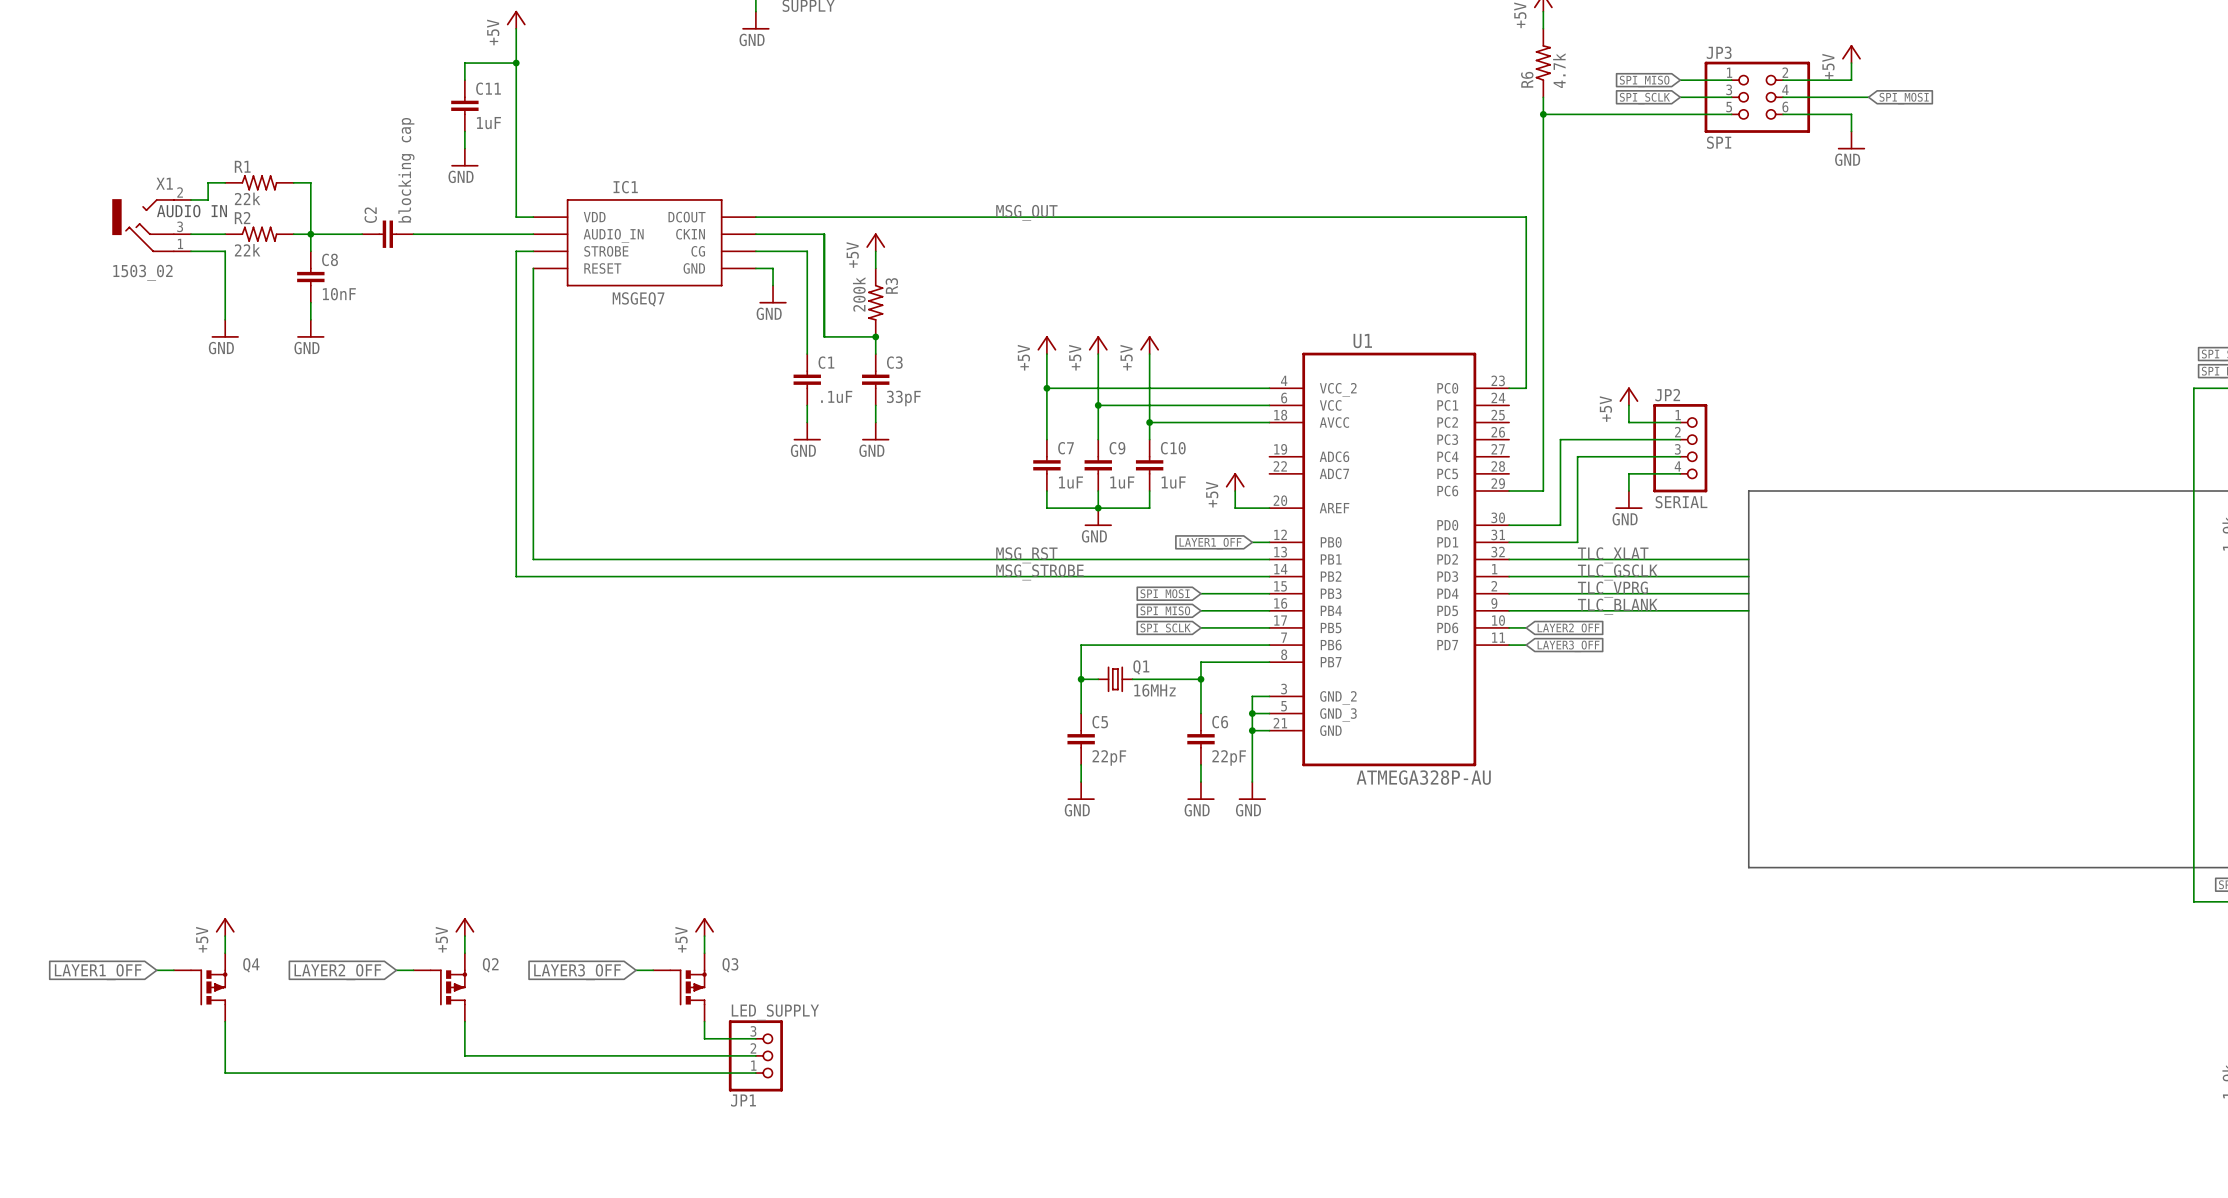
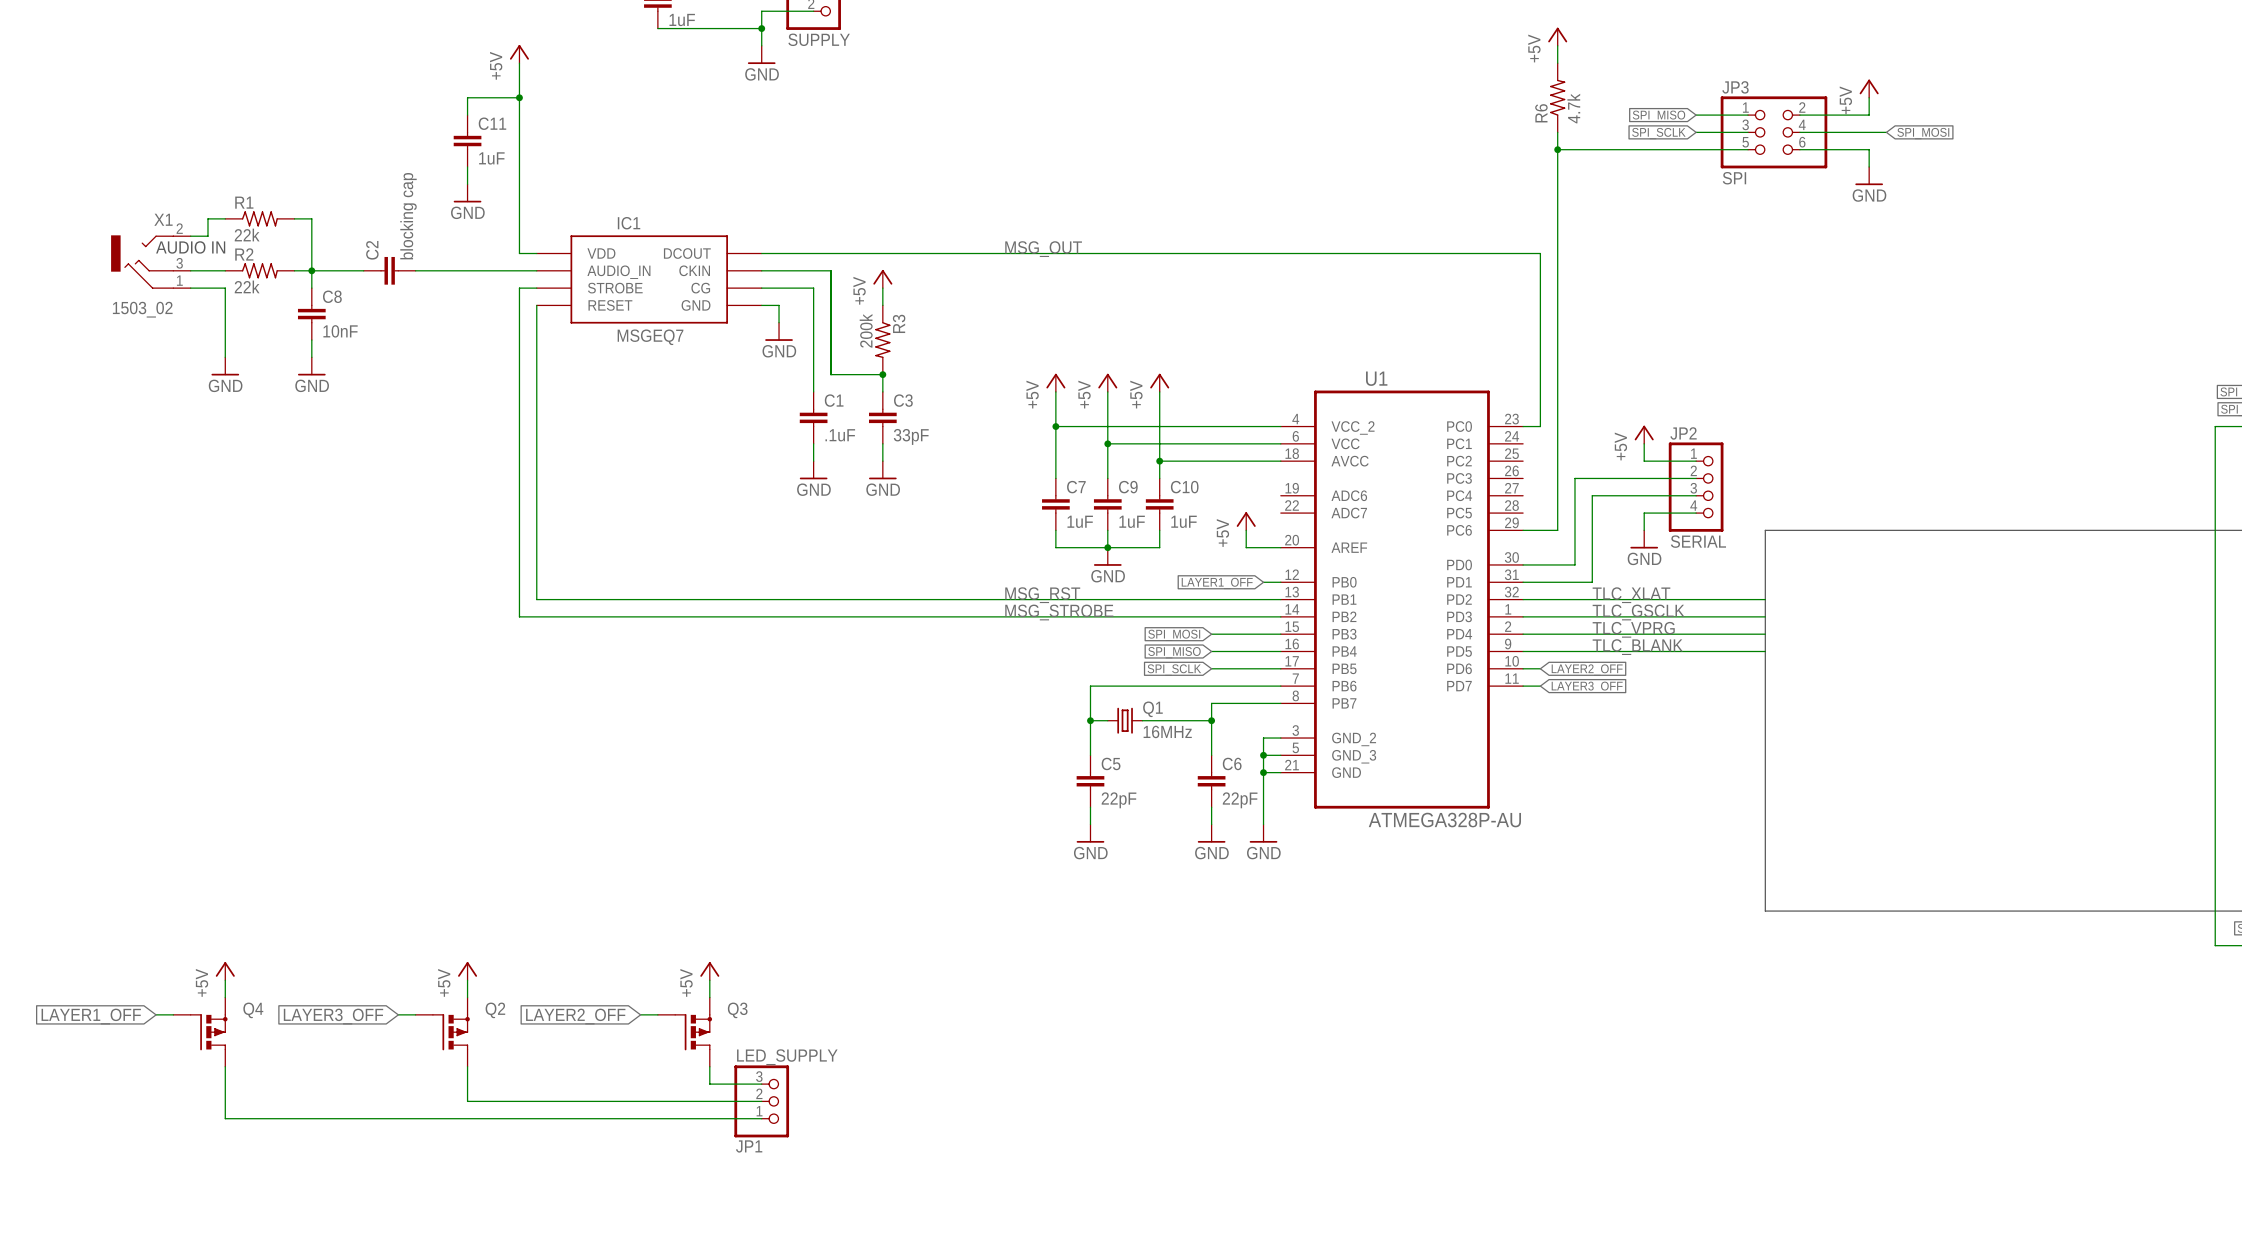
global label: LAYER2_OFF (337, 972) -> LAYER3_OFF (333, 1016)
global label: LAYER3_OFF (577, 972) -> LAYER2_OFF (575, 1016)

